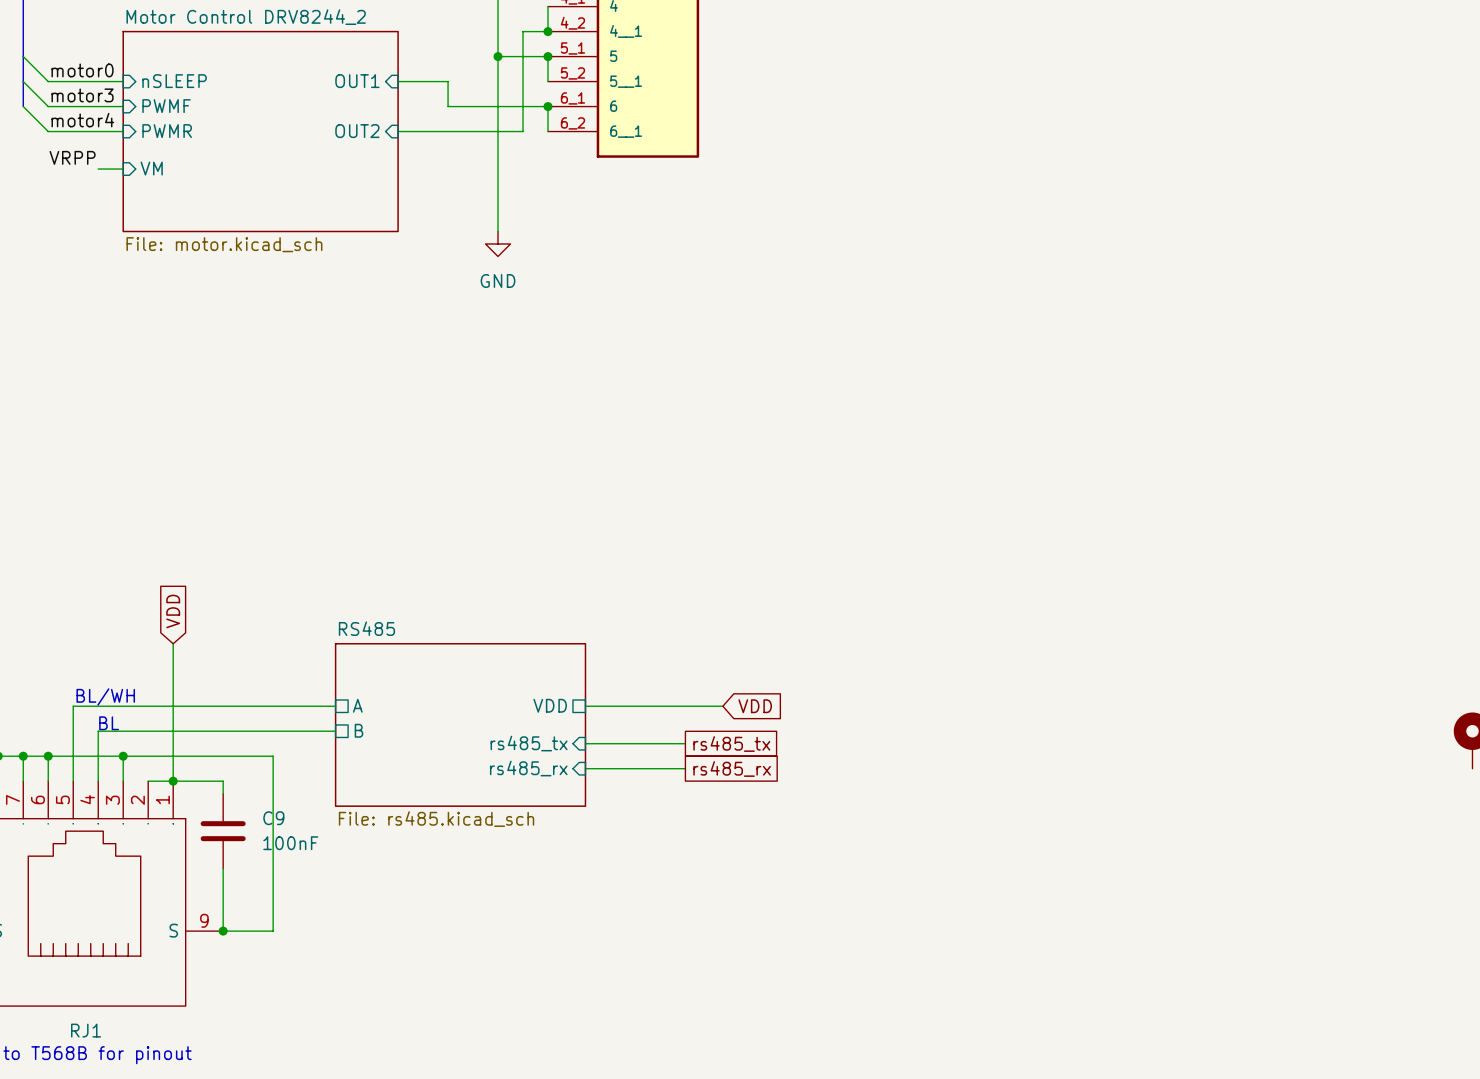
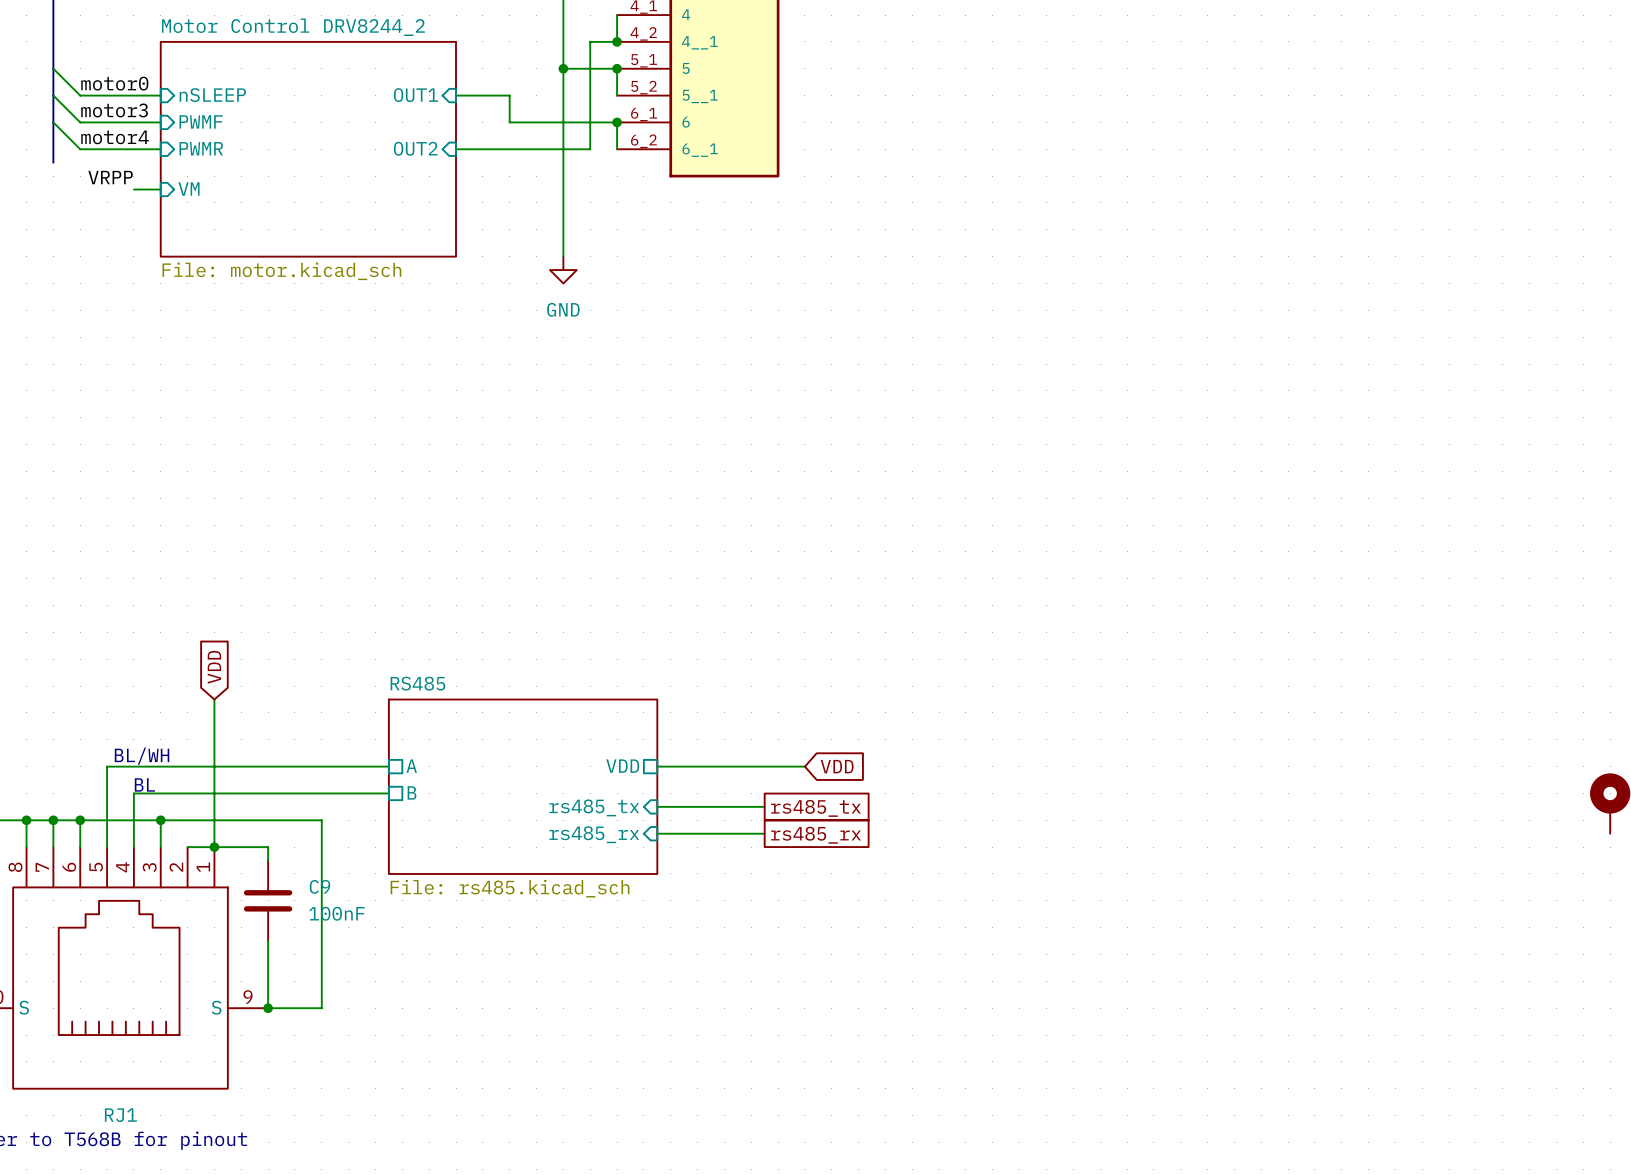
bus: none -> (53, 122) (53, 162)

